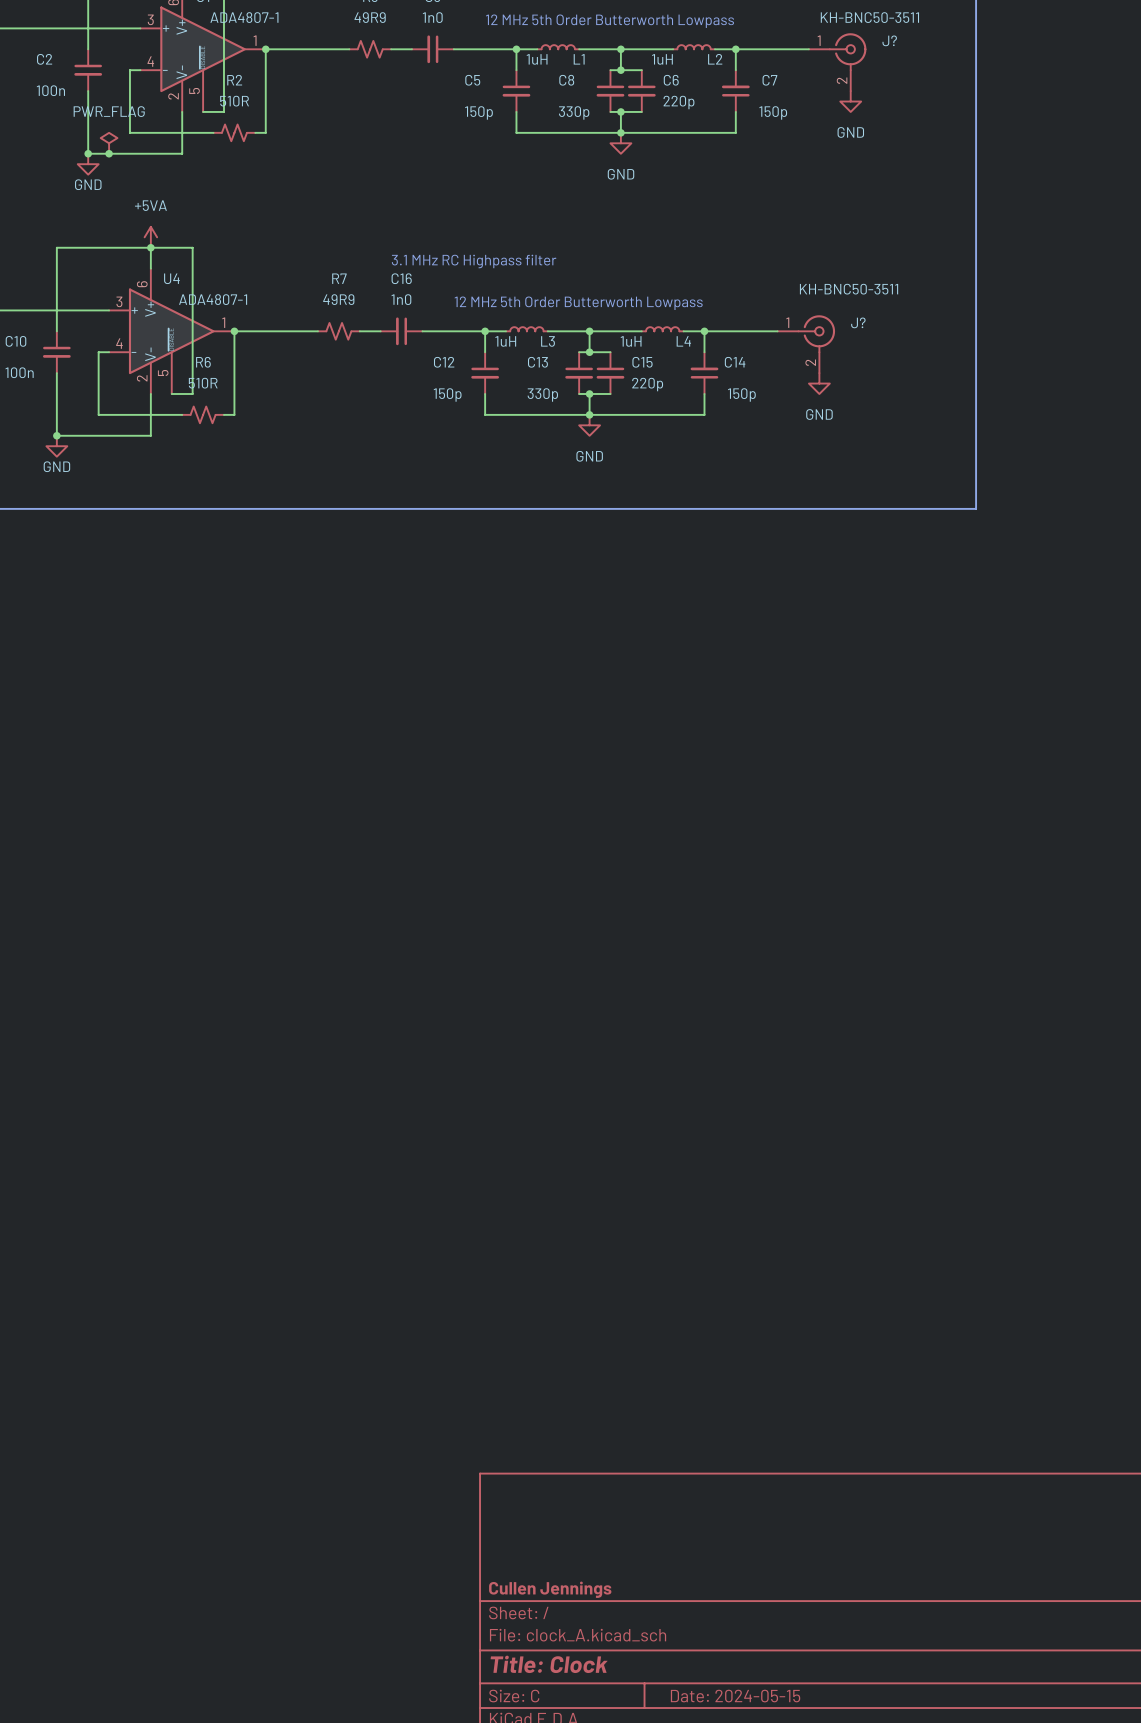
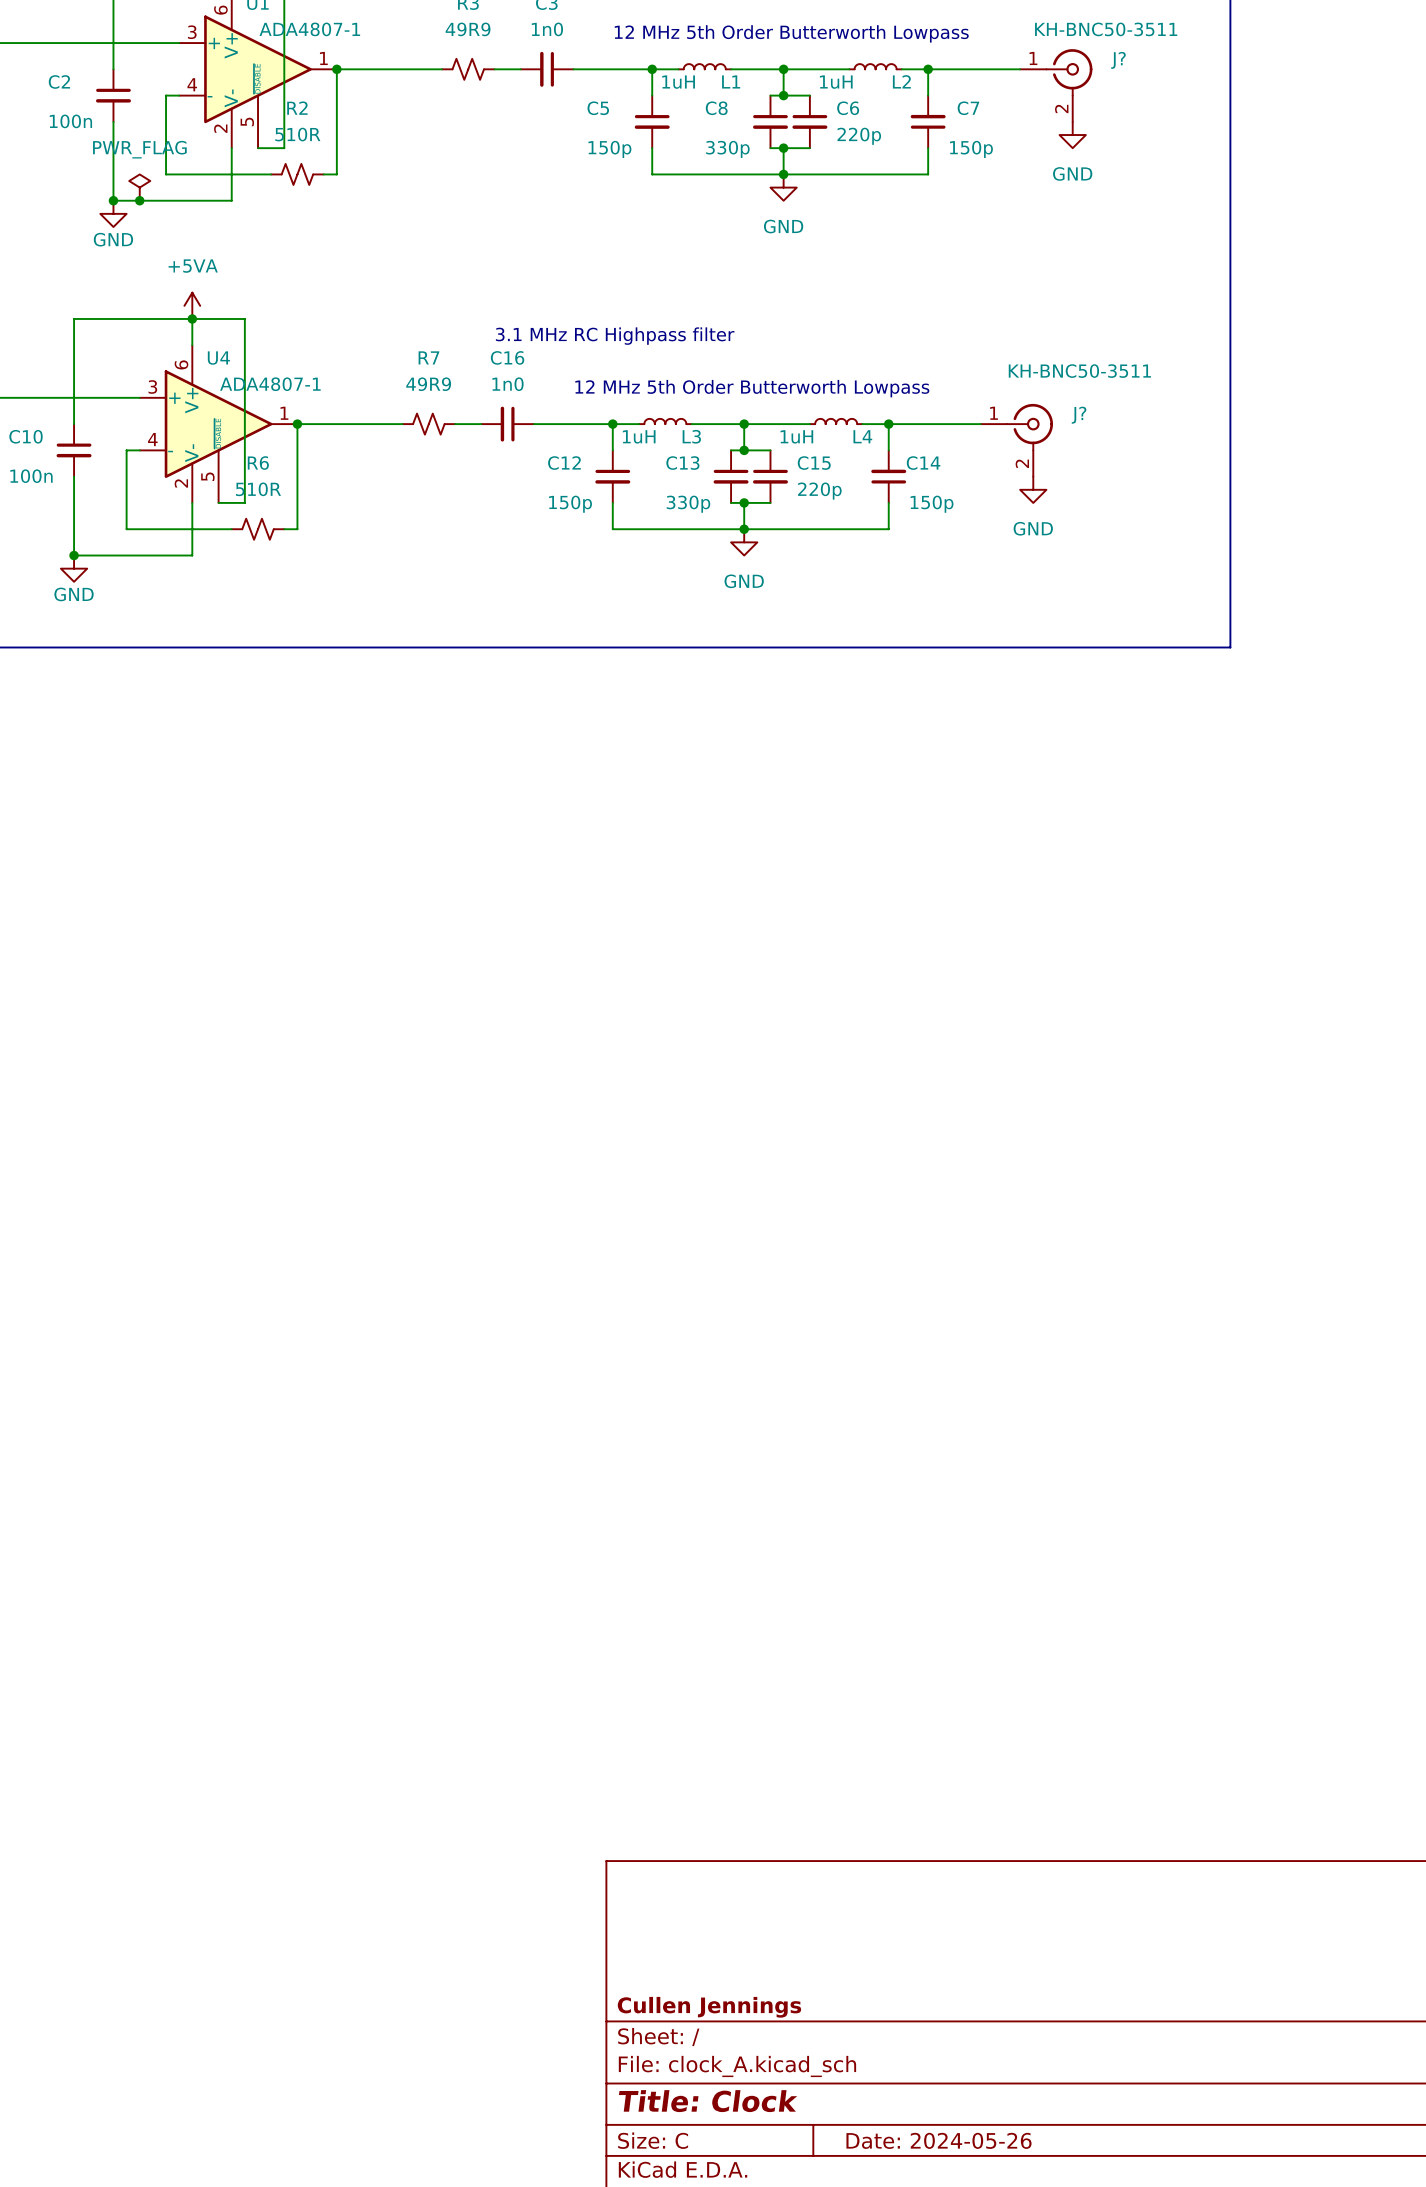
title block: Date: 2024-05-15 (735, 1696) -> Date: 2024-05-26 (938, 2140)

